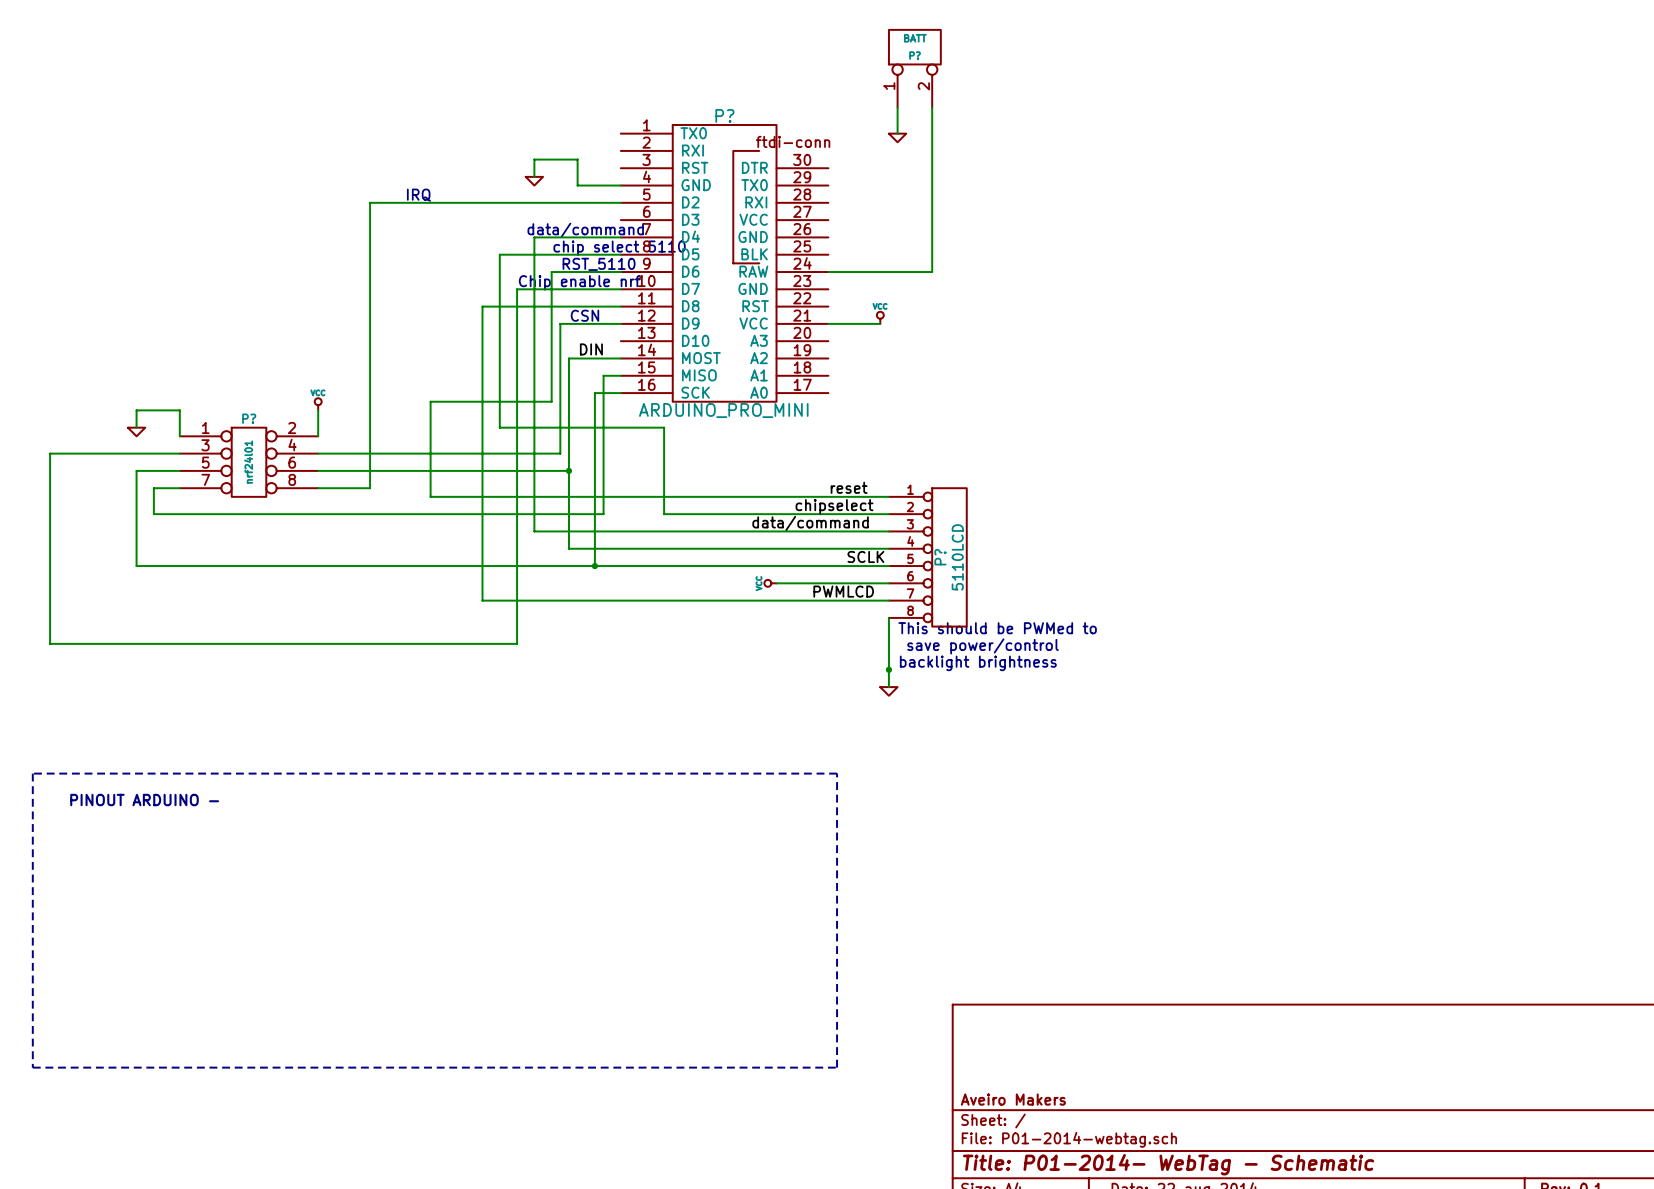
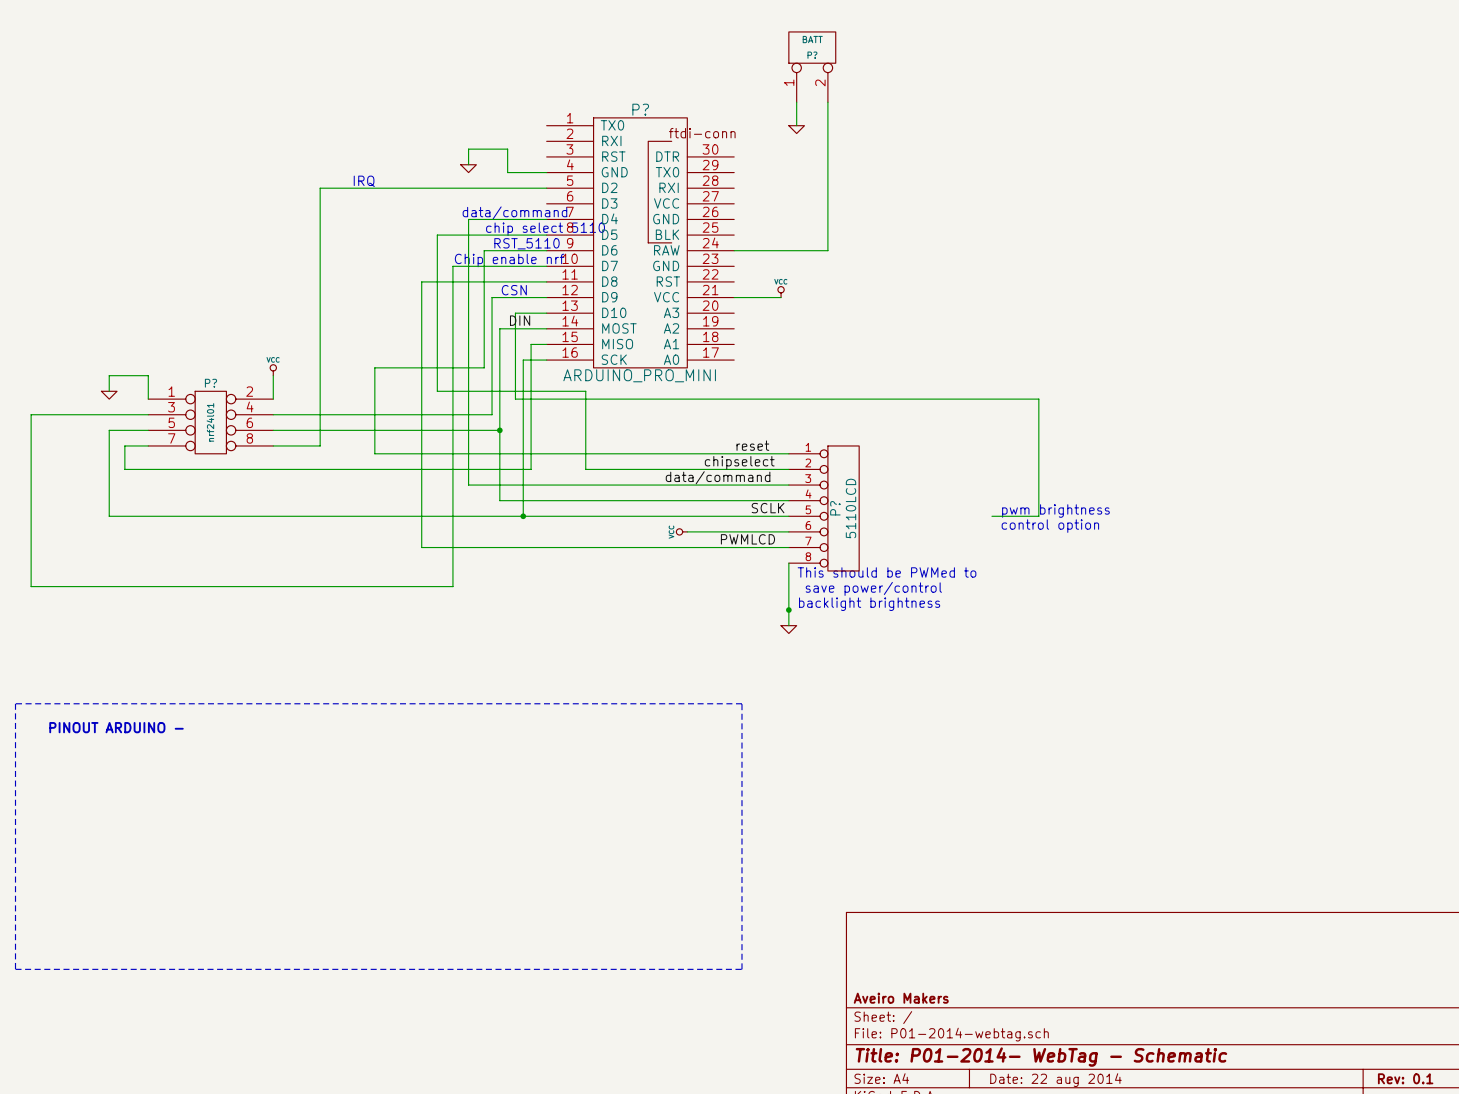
wire: none -> (546, 313) (515, 313) (515, 399) (1038, 399) (1038, 516) (991, 516)
text: none -> pwm brightness (1055, 511)
text: none -> control option (1050, 526)

